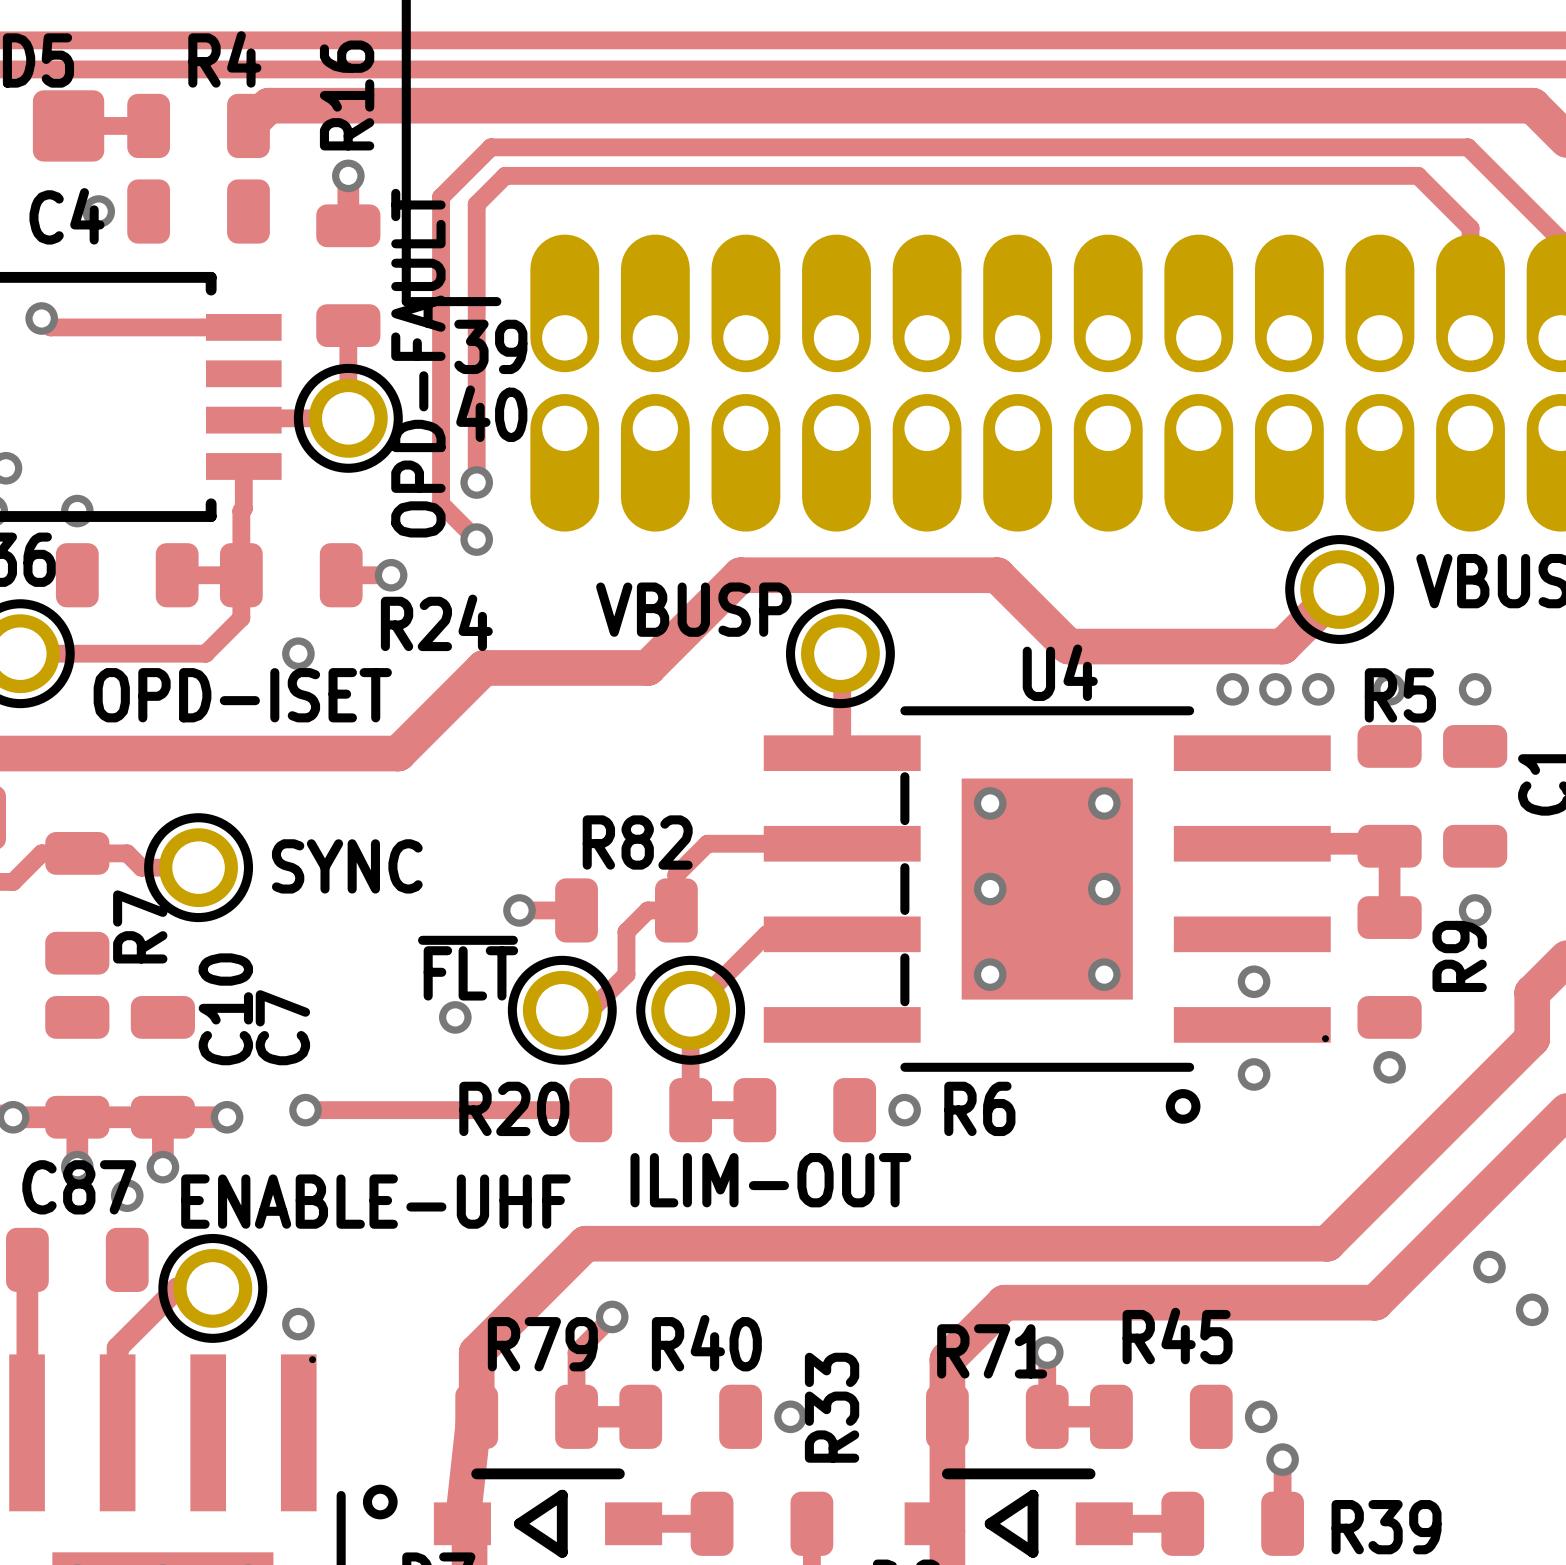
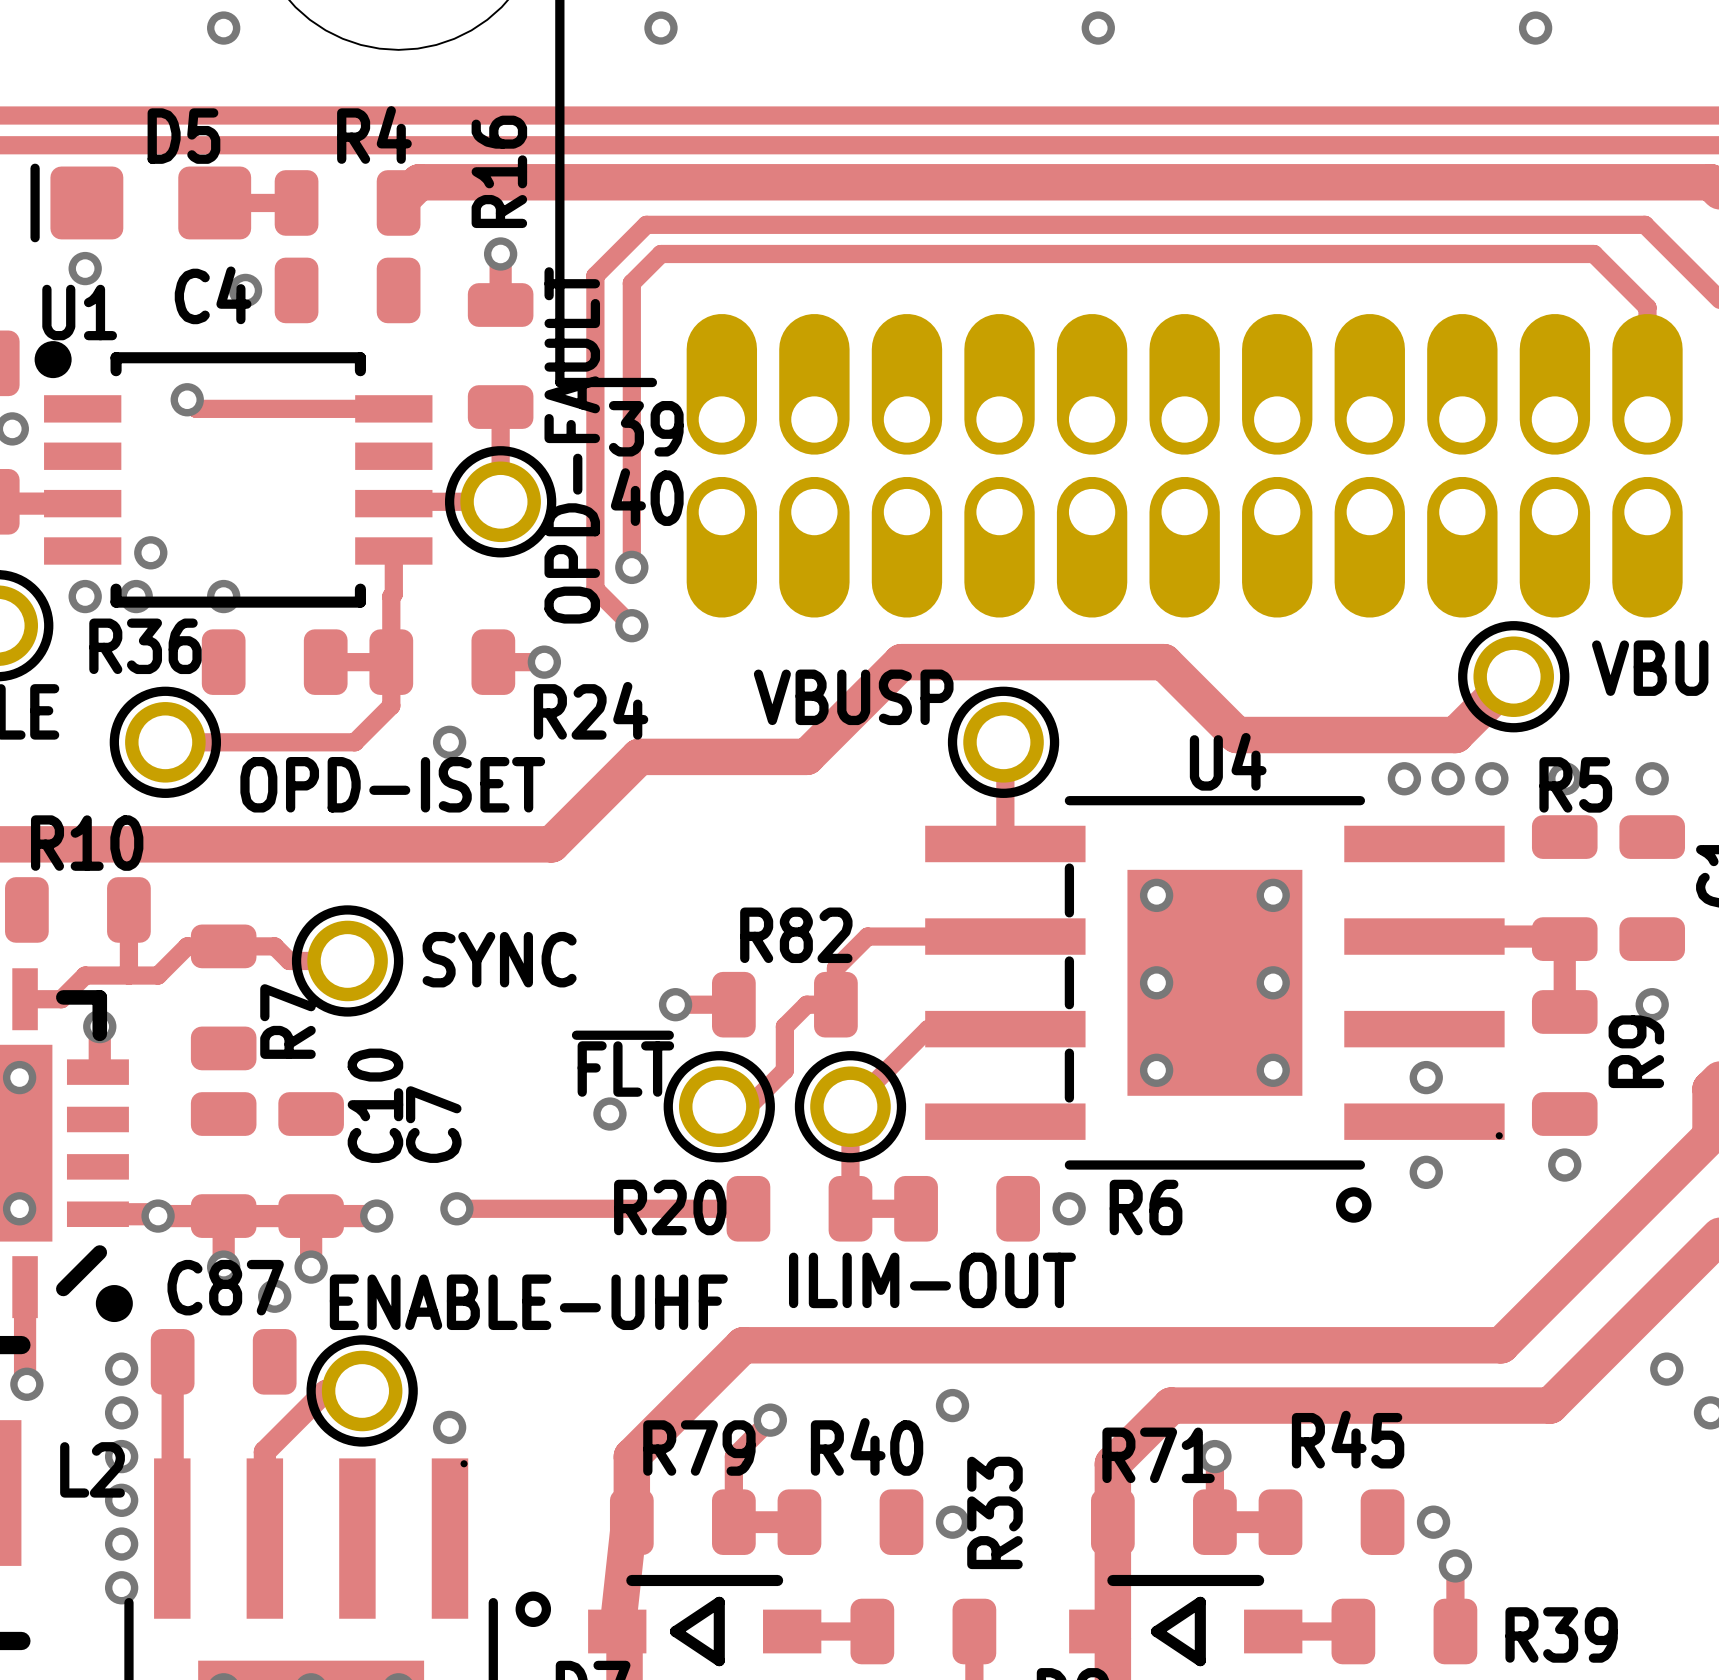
via: none -> (952, 1405)

